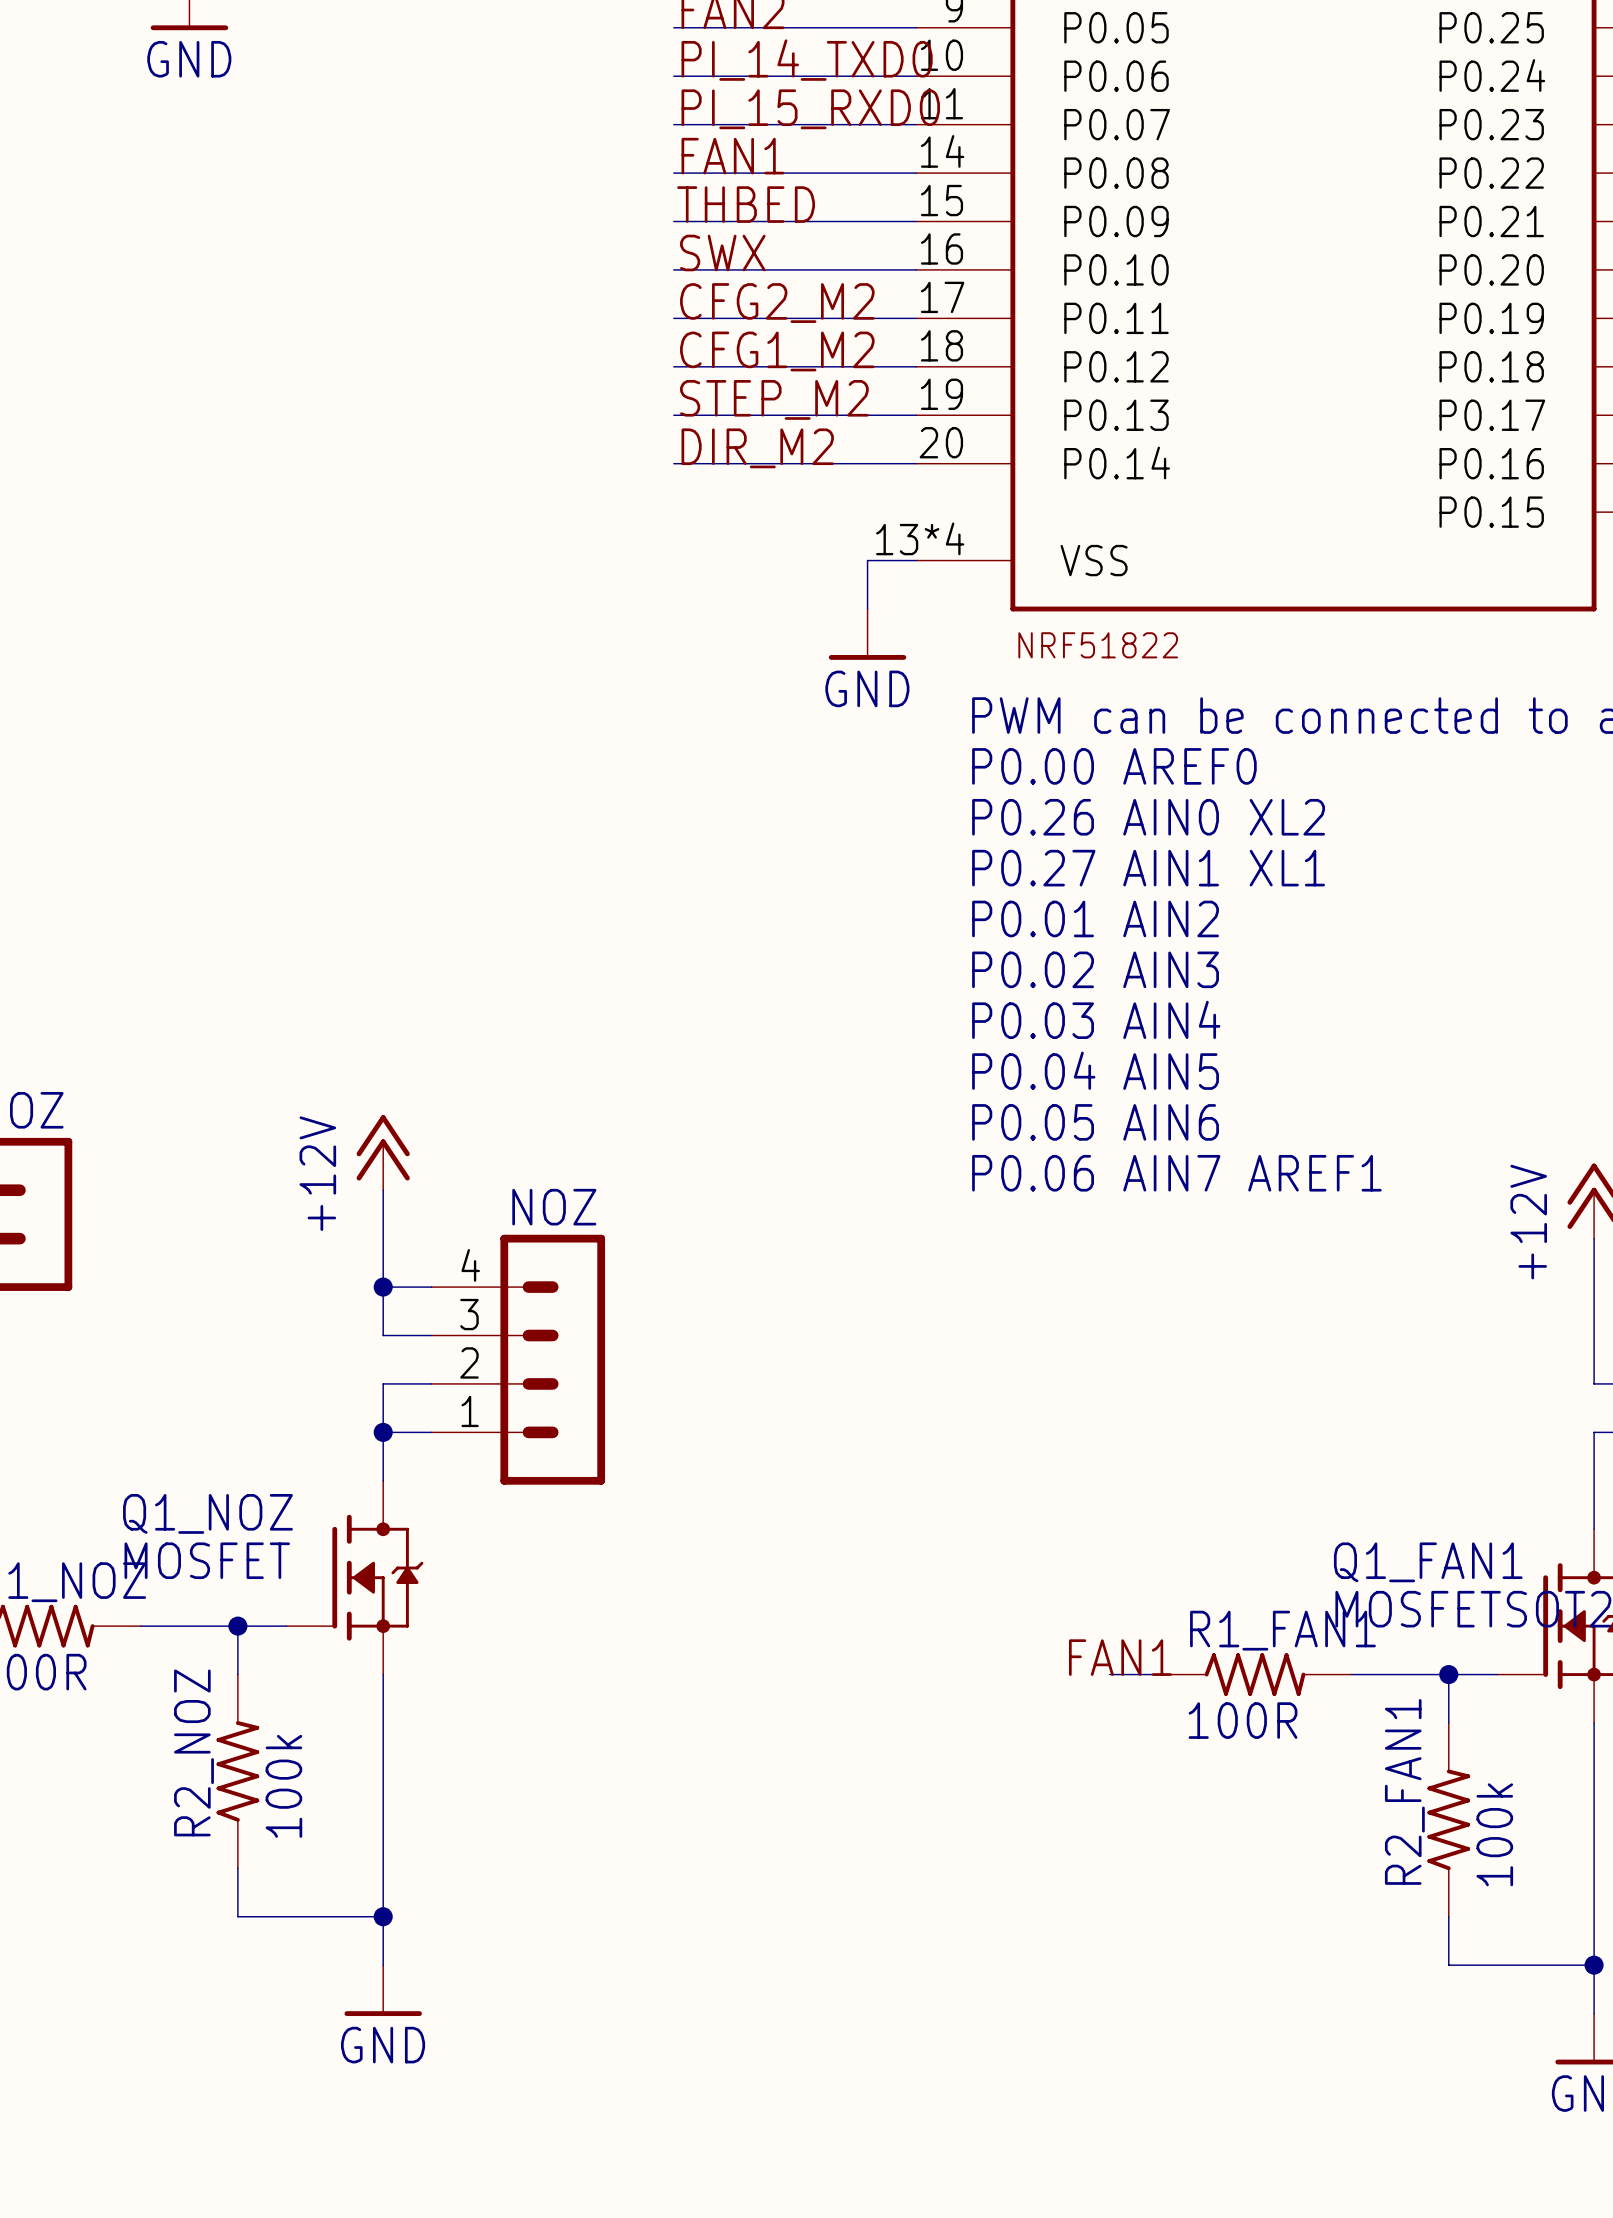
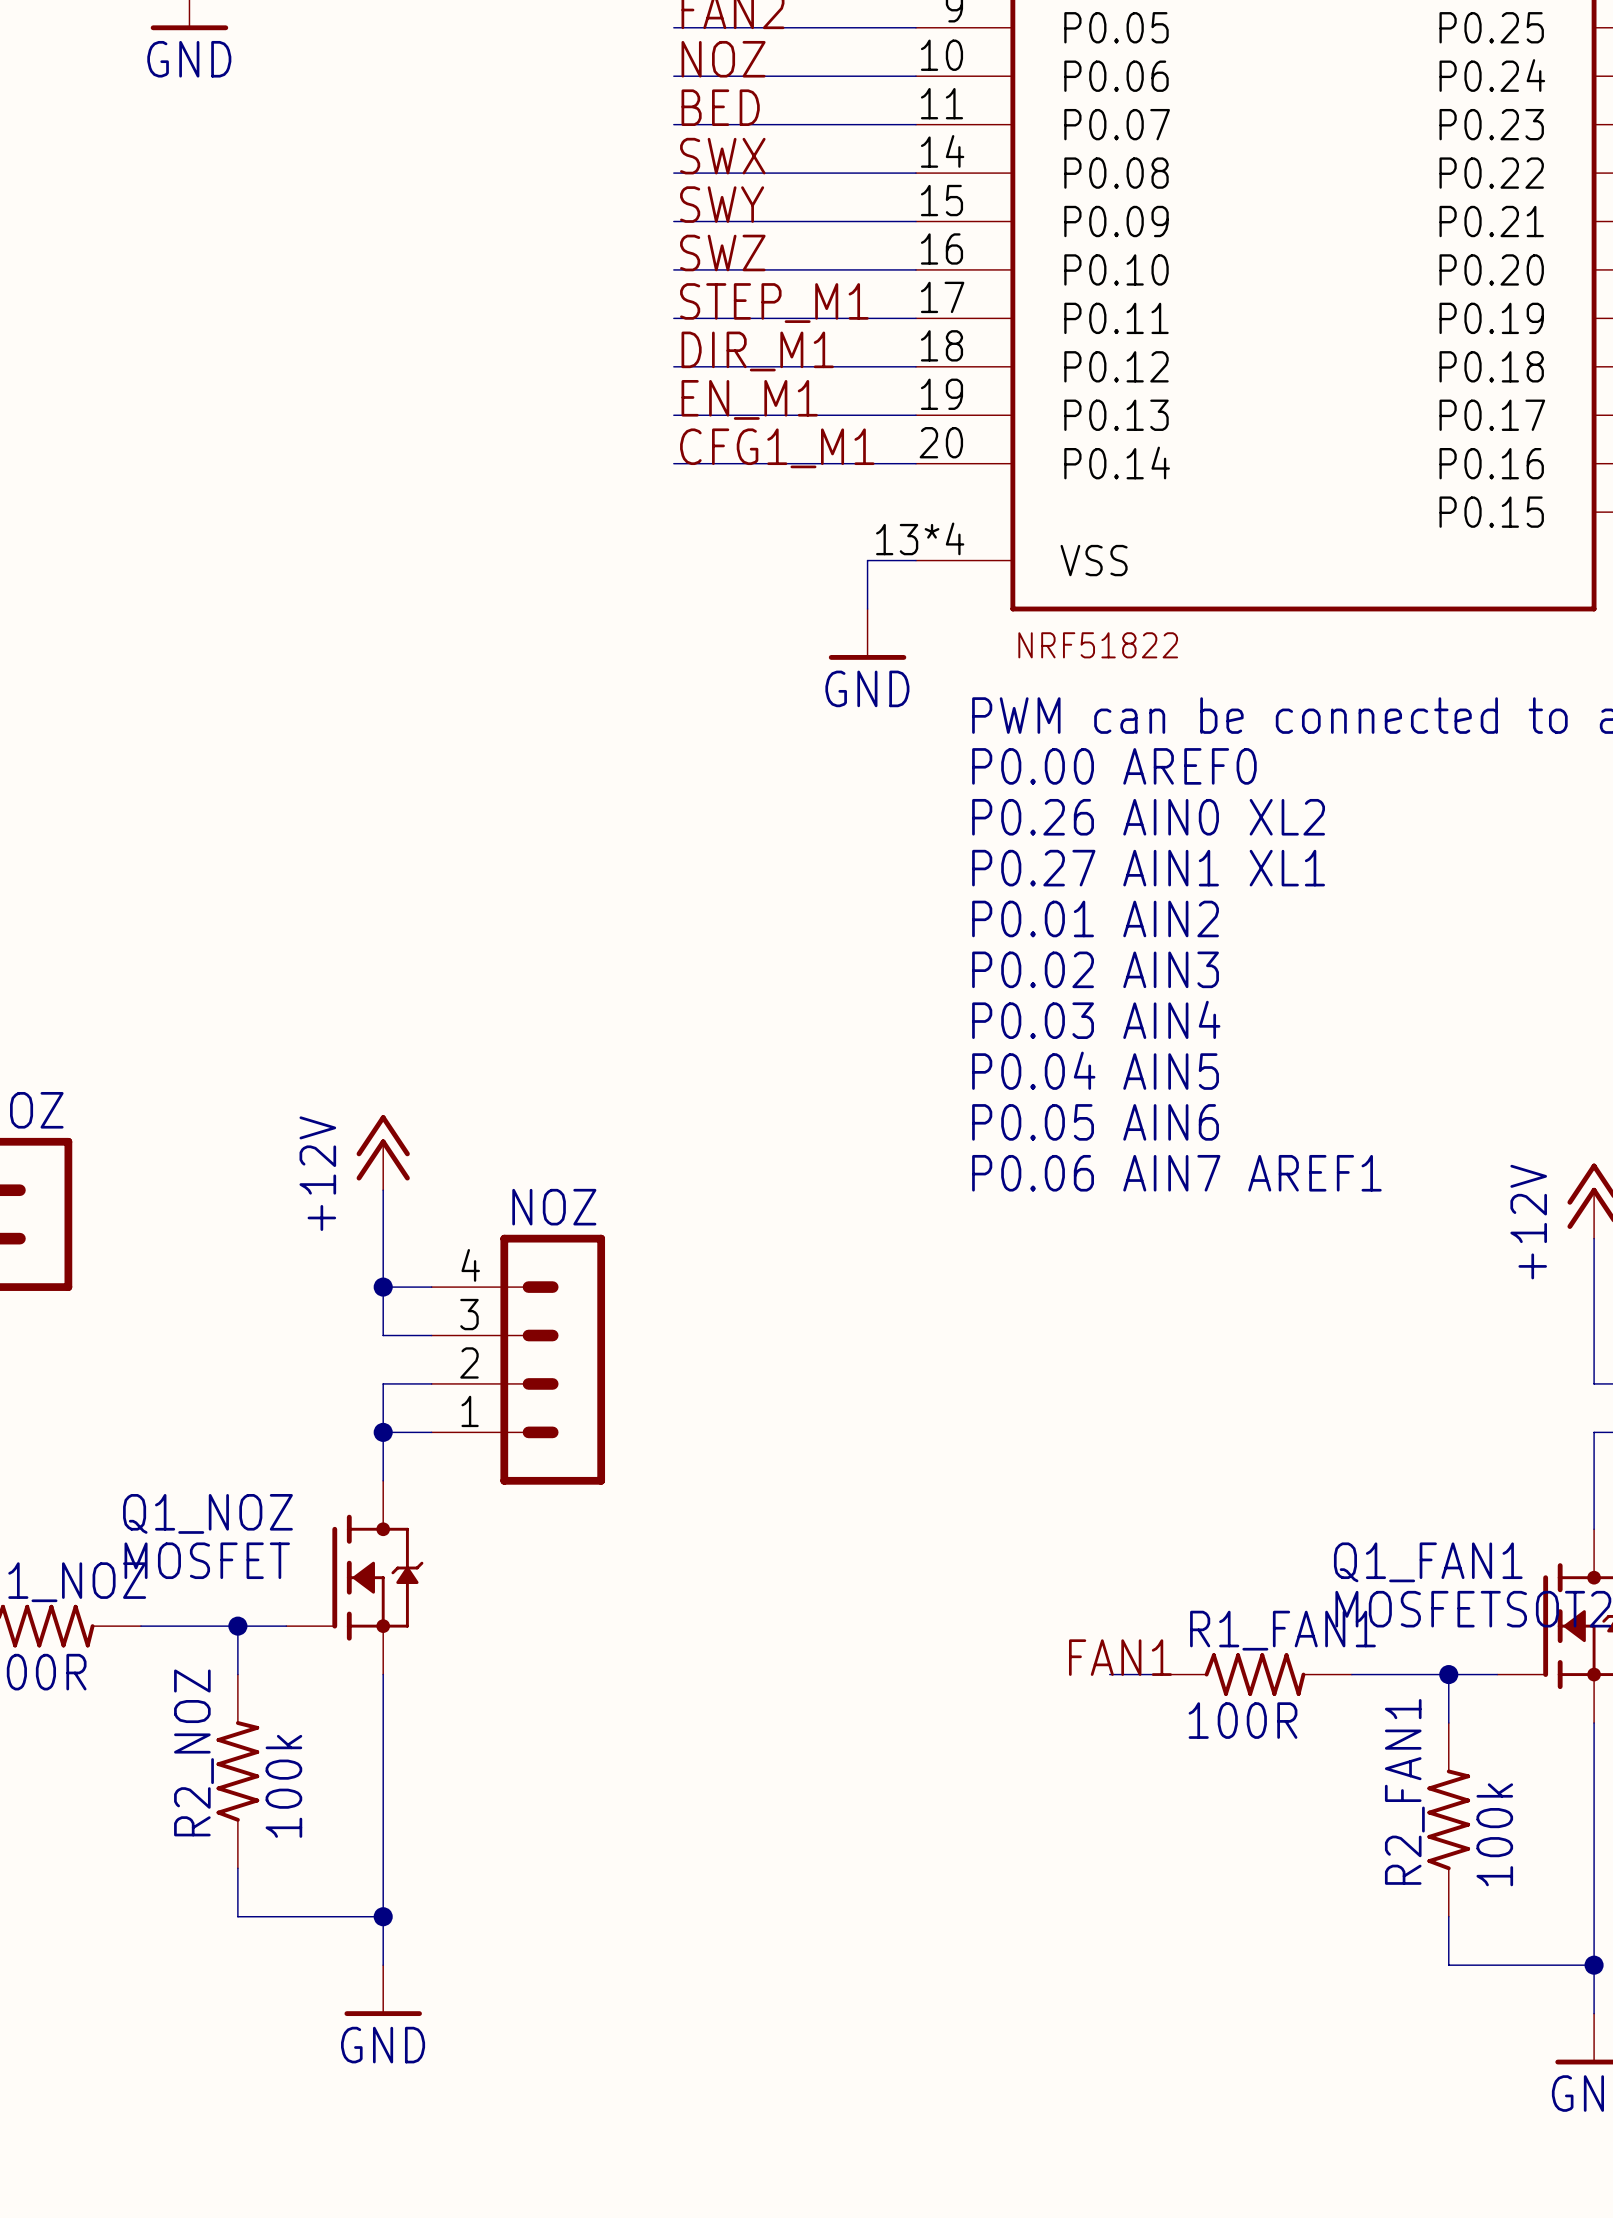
label: PI_14_TXD0 (807, 60) -> NOZ (723, 59)
label: PI_15_RXD0 (810, 109) -> BED (720, 107)
label: FAN1 (732, 156) -> SWX (722, 156)
label: THBED (746, 204) -> SWY (722, 204)
label: SWX (722, 252) -> SWZ (722, 252)
label: CFG2_M2 (777, 303) -> STEP_M1 (774, 303)
label: CFG1_M2 (777, 351) -> DIR_M1 (757, 351)
label: STEP_M2 (774, 399) -> EN_M1 (749, 399)
label: DIR_M2 (757, 448) -> CFG1_M1 (777, 448)

